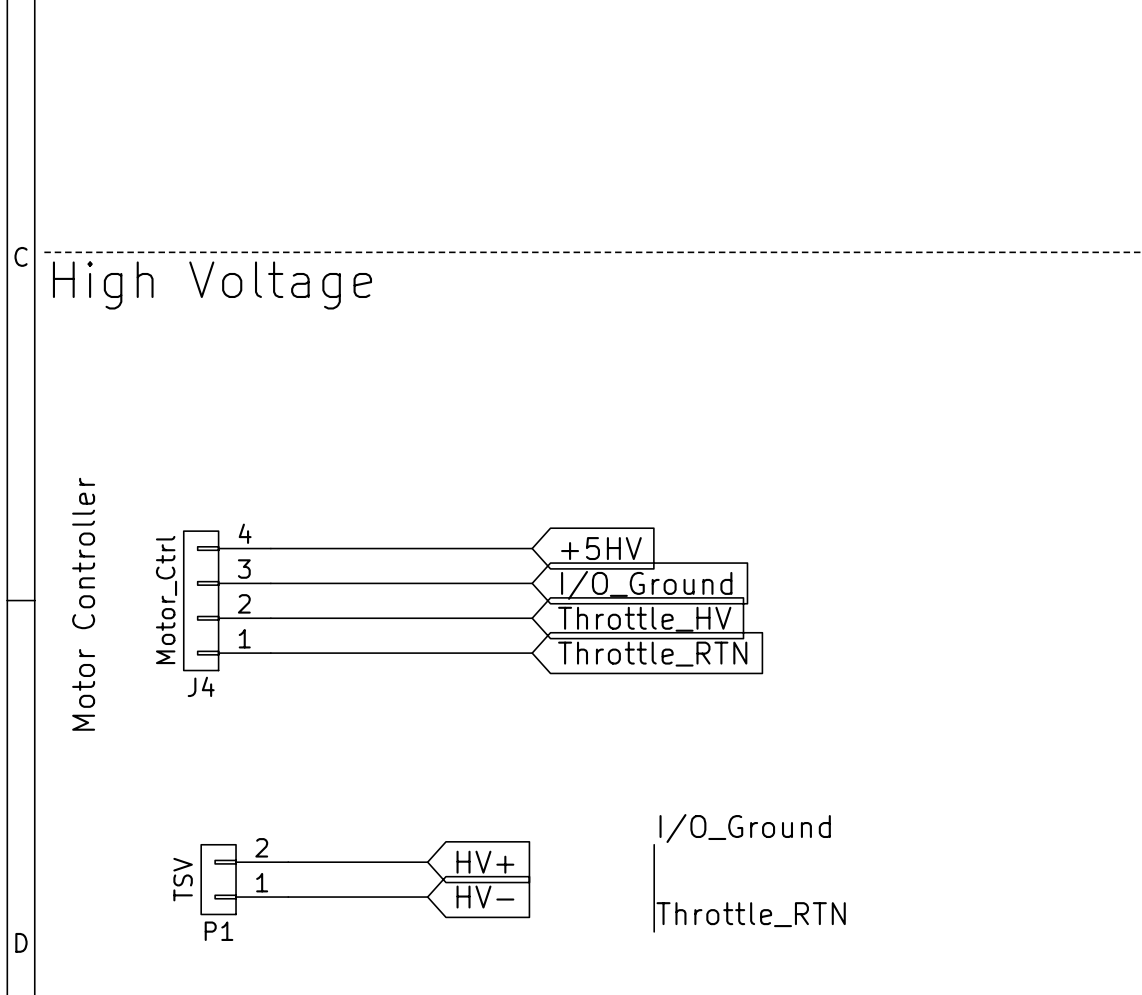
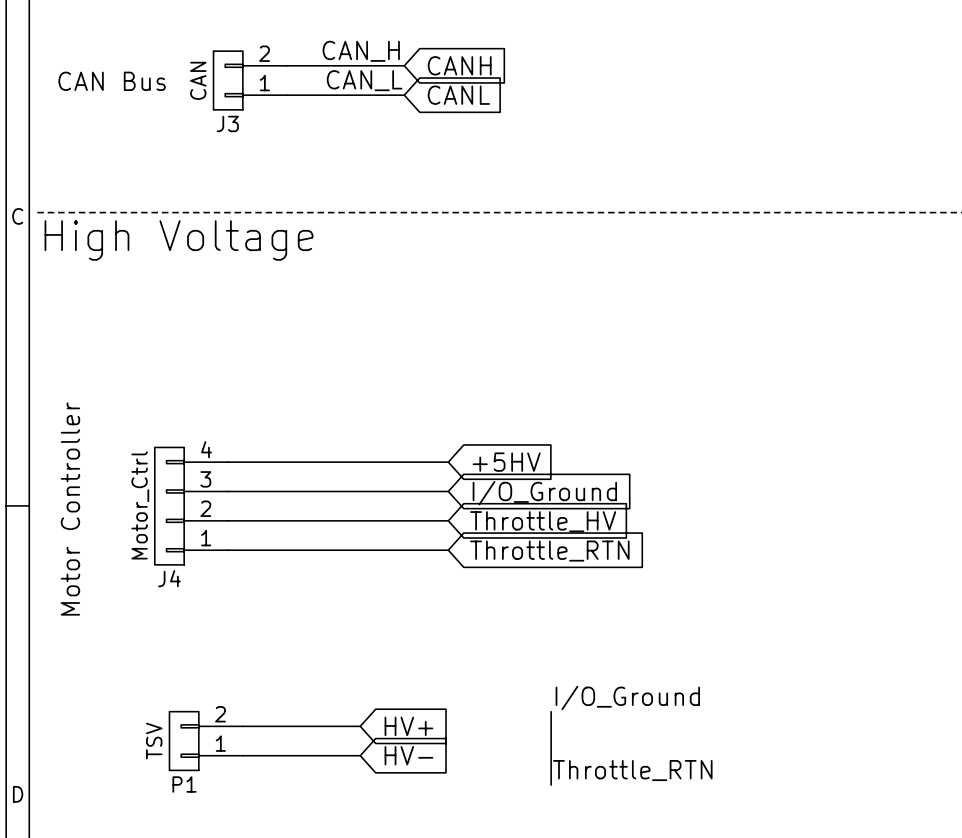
label: none -> CAN_H (361, 51)
wire: none -> (286, 65) (404, 65)
global label: none -> CANH (459, 65)
J3: none -> CAN (250, 80)
label: none -> CAN_L (364, 80)
text: none -> CAN Bus (112, 81)
wire: none -> (286, 95) (404, 95)
global label: none -> CANL (458, 95)

